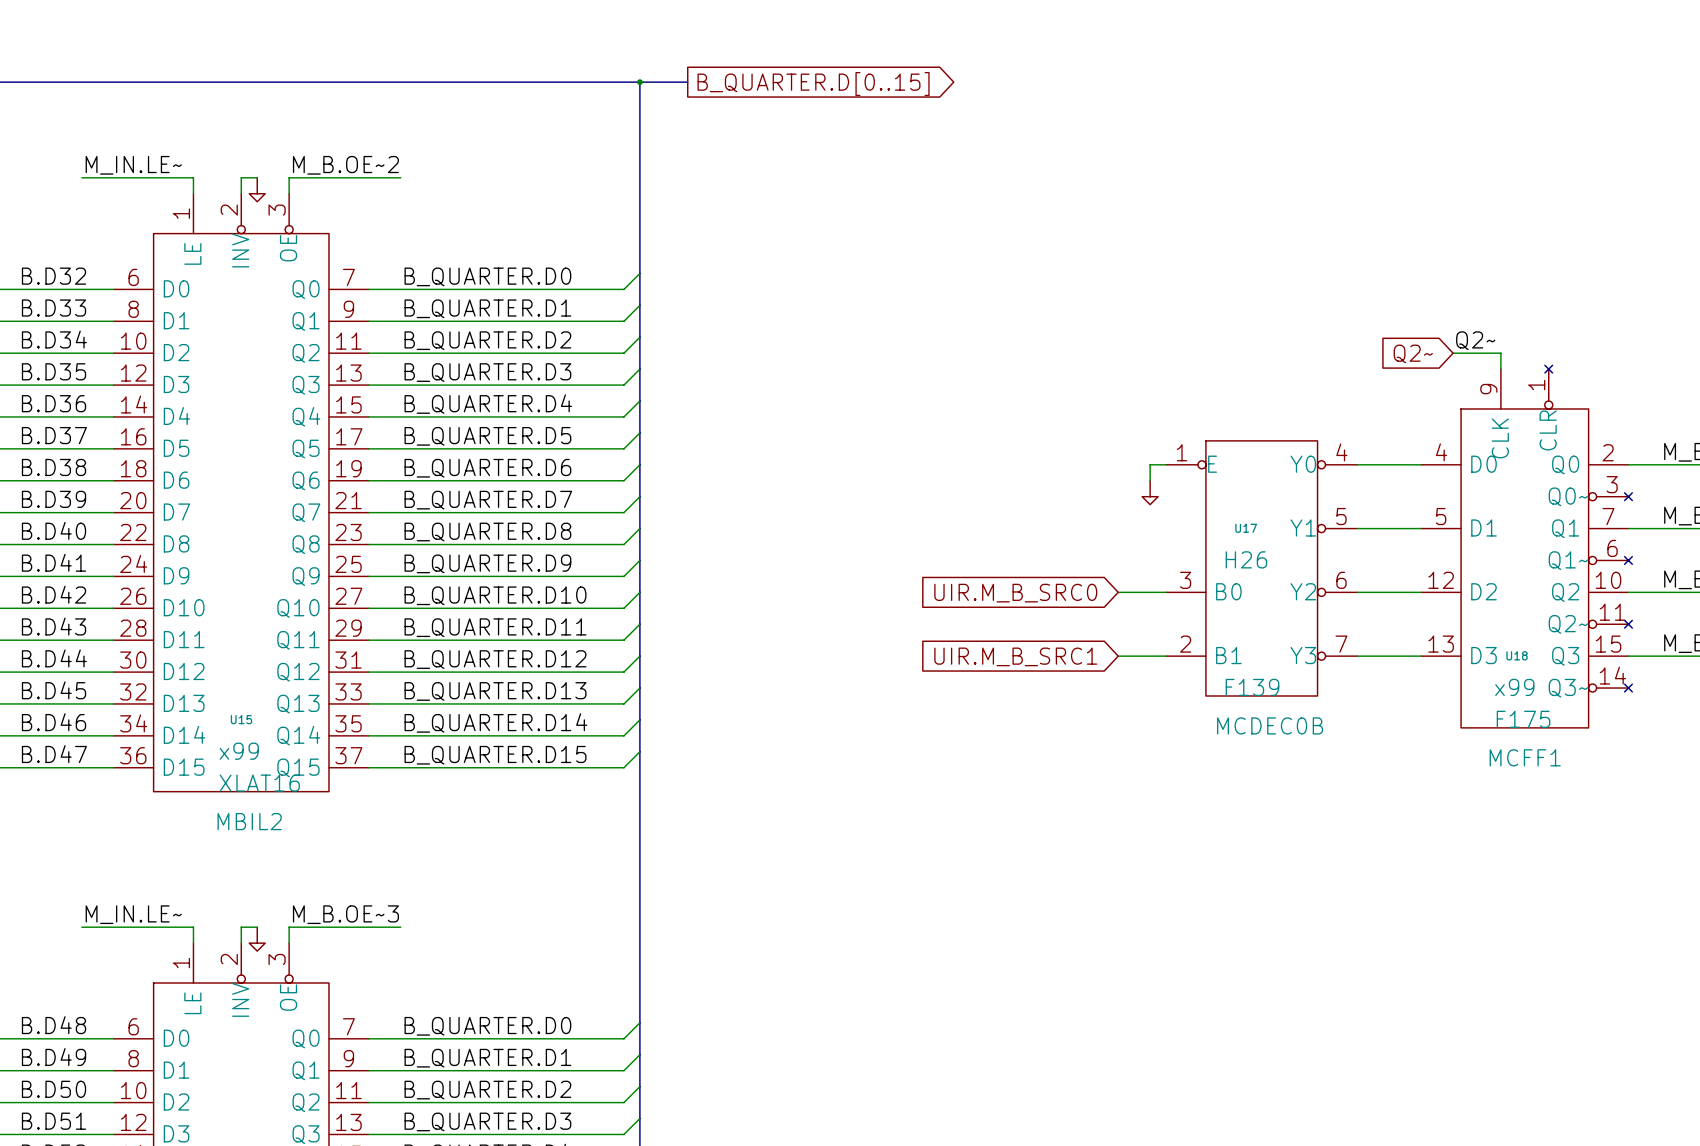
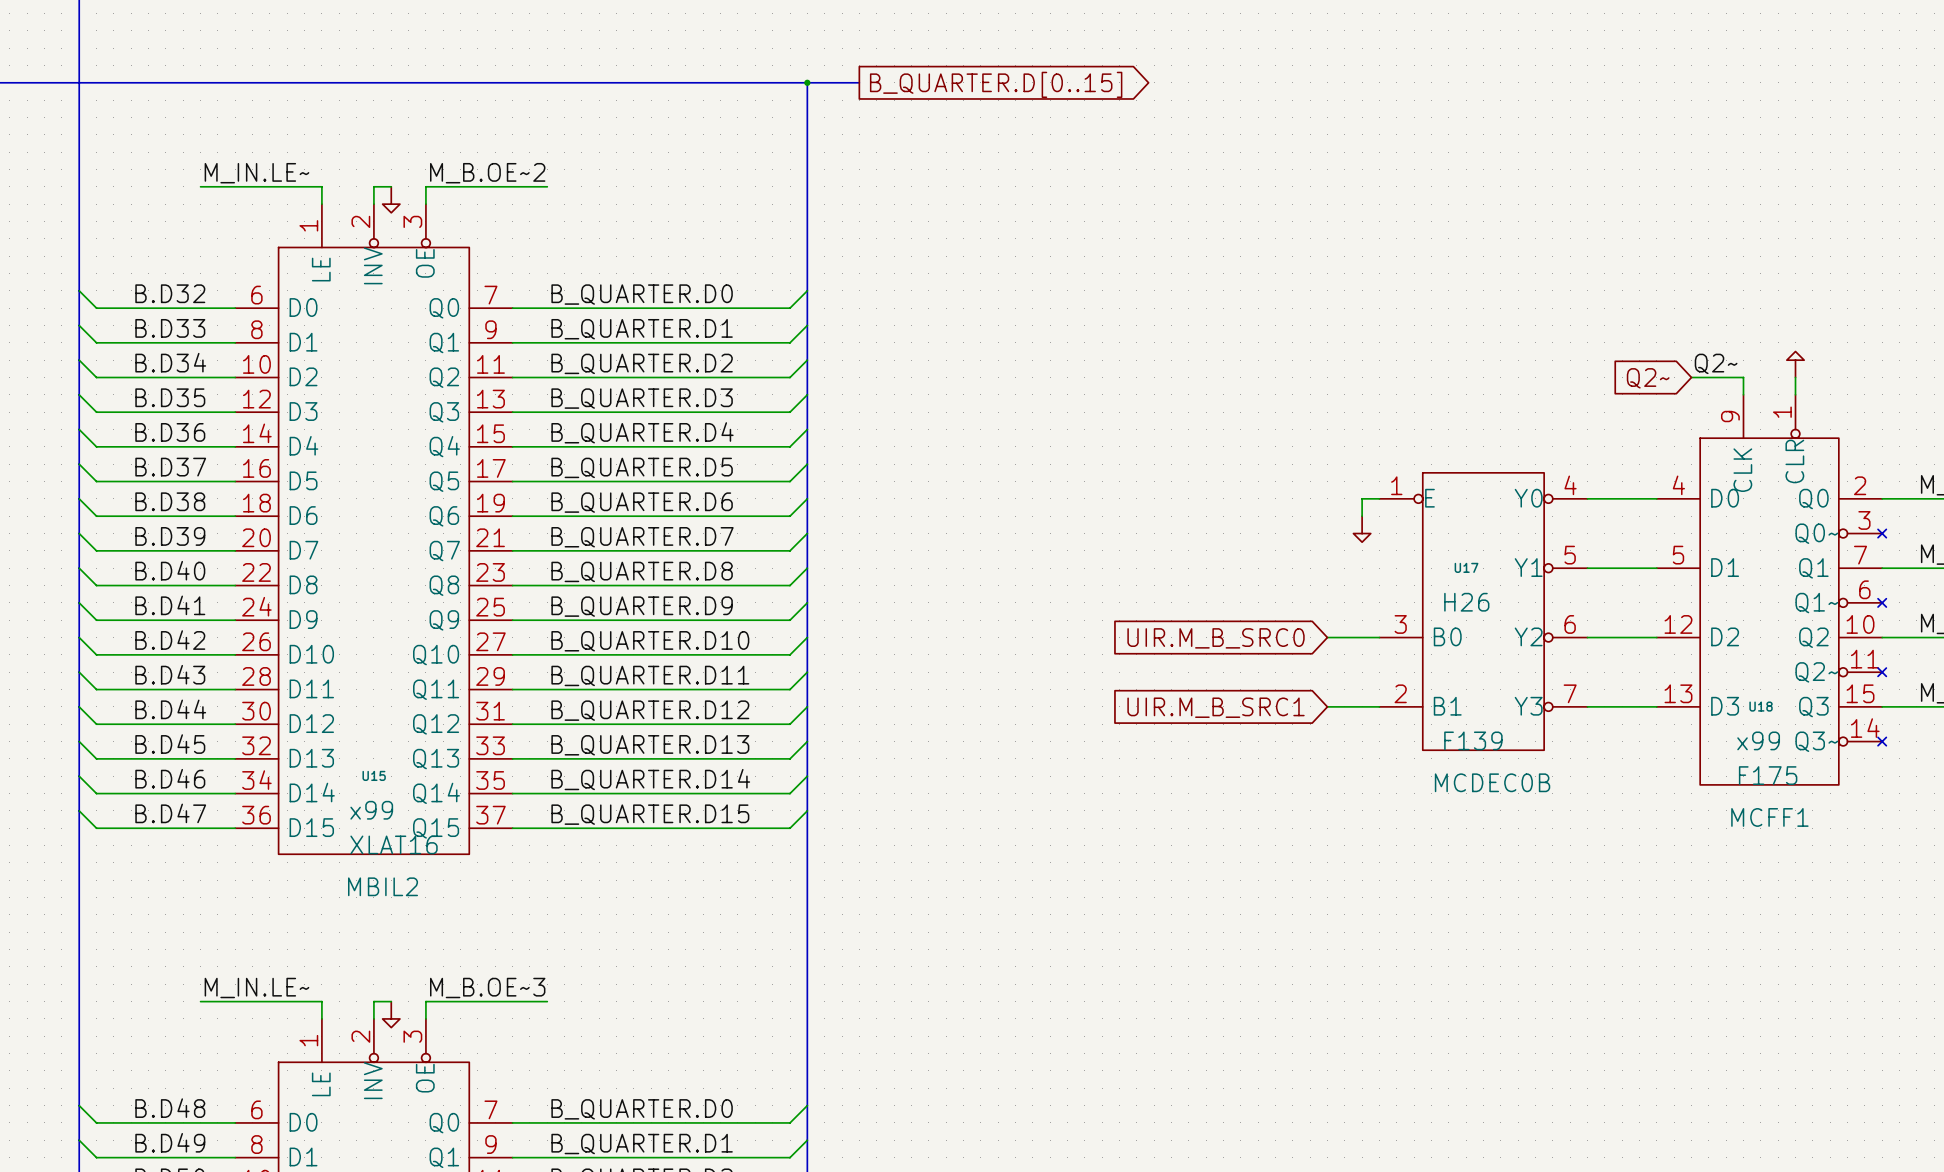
power symbol: none -> (1795, 364)
wire: none -> (1795, 377) (1795, 394)
no-connect mark: (1548, 369) -> none

